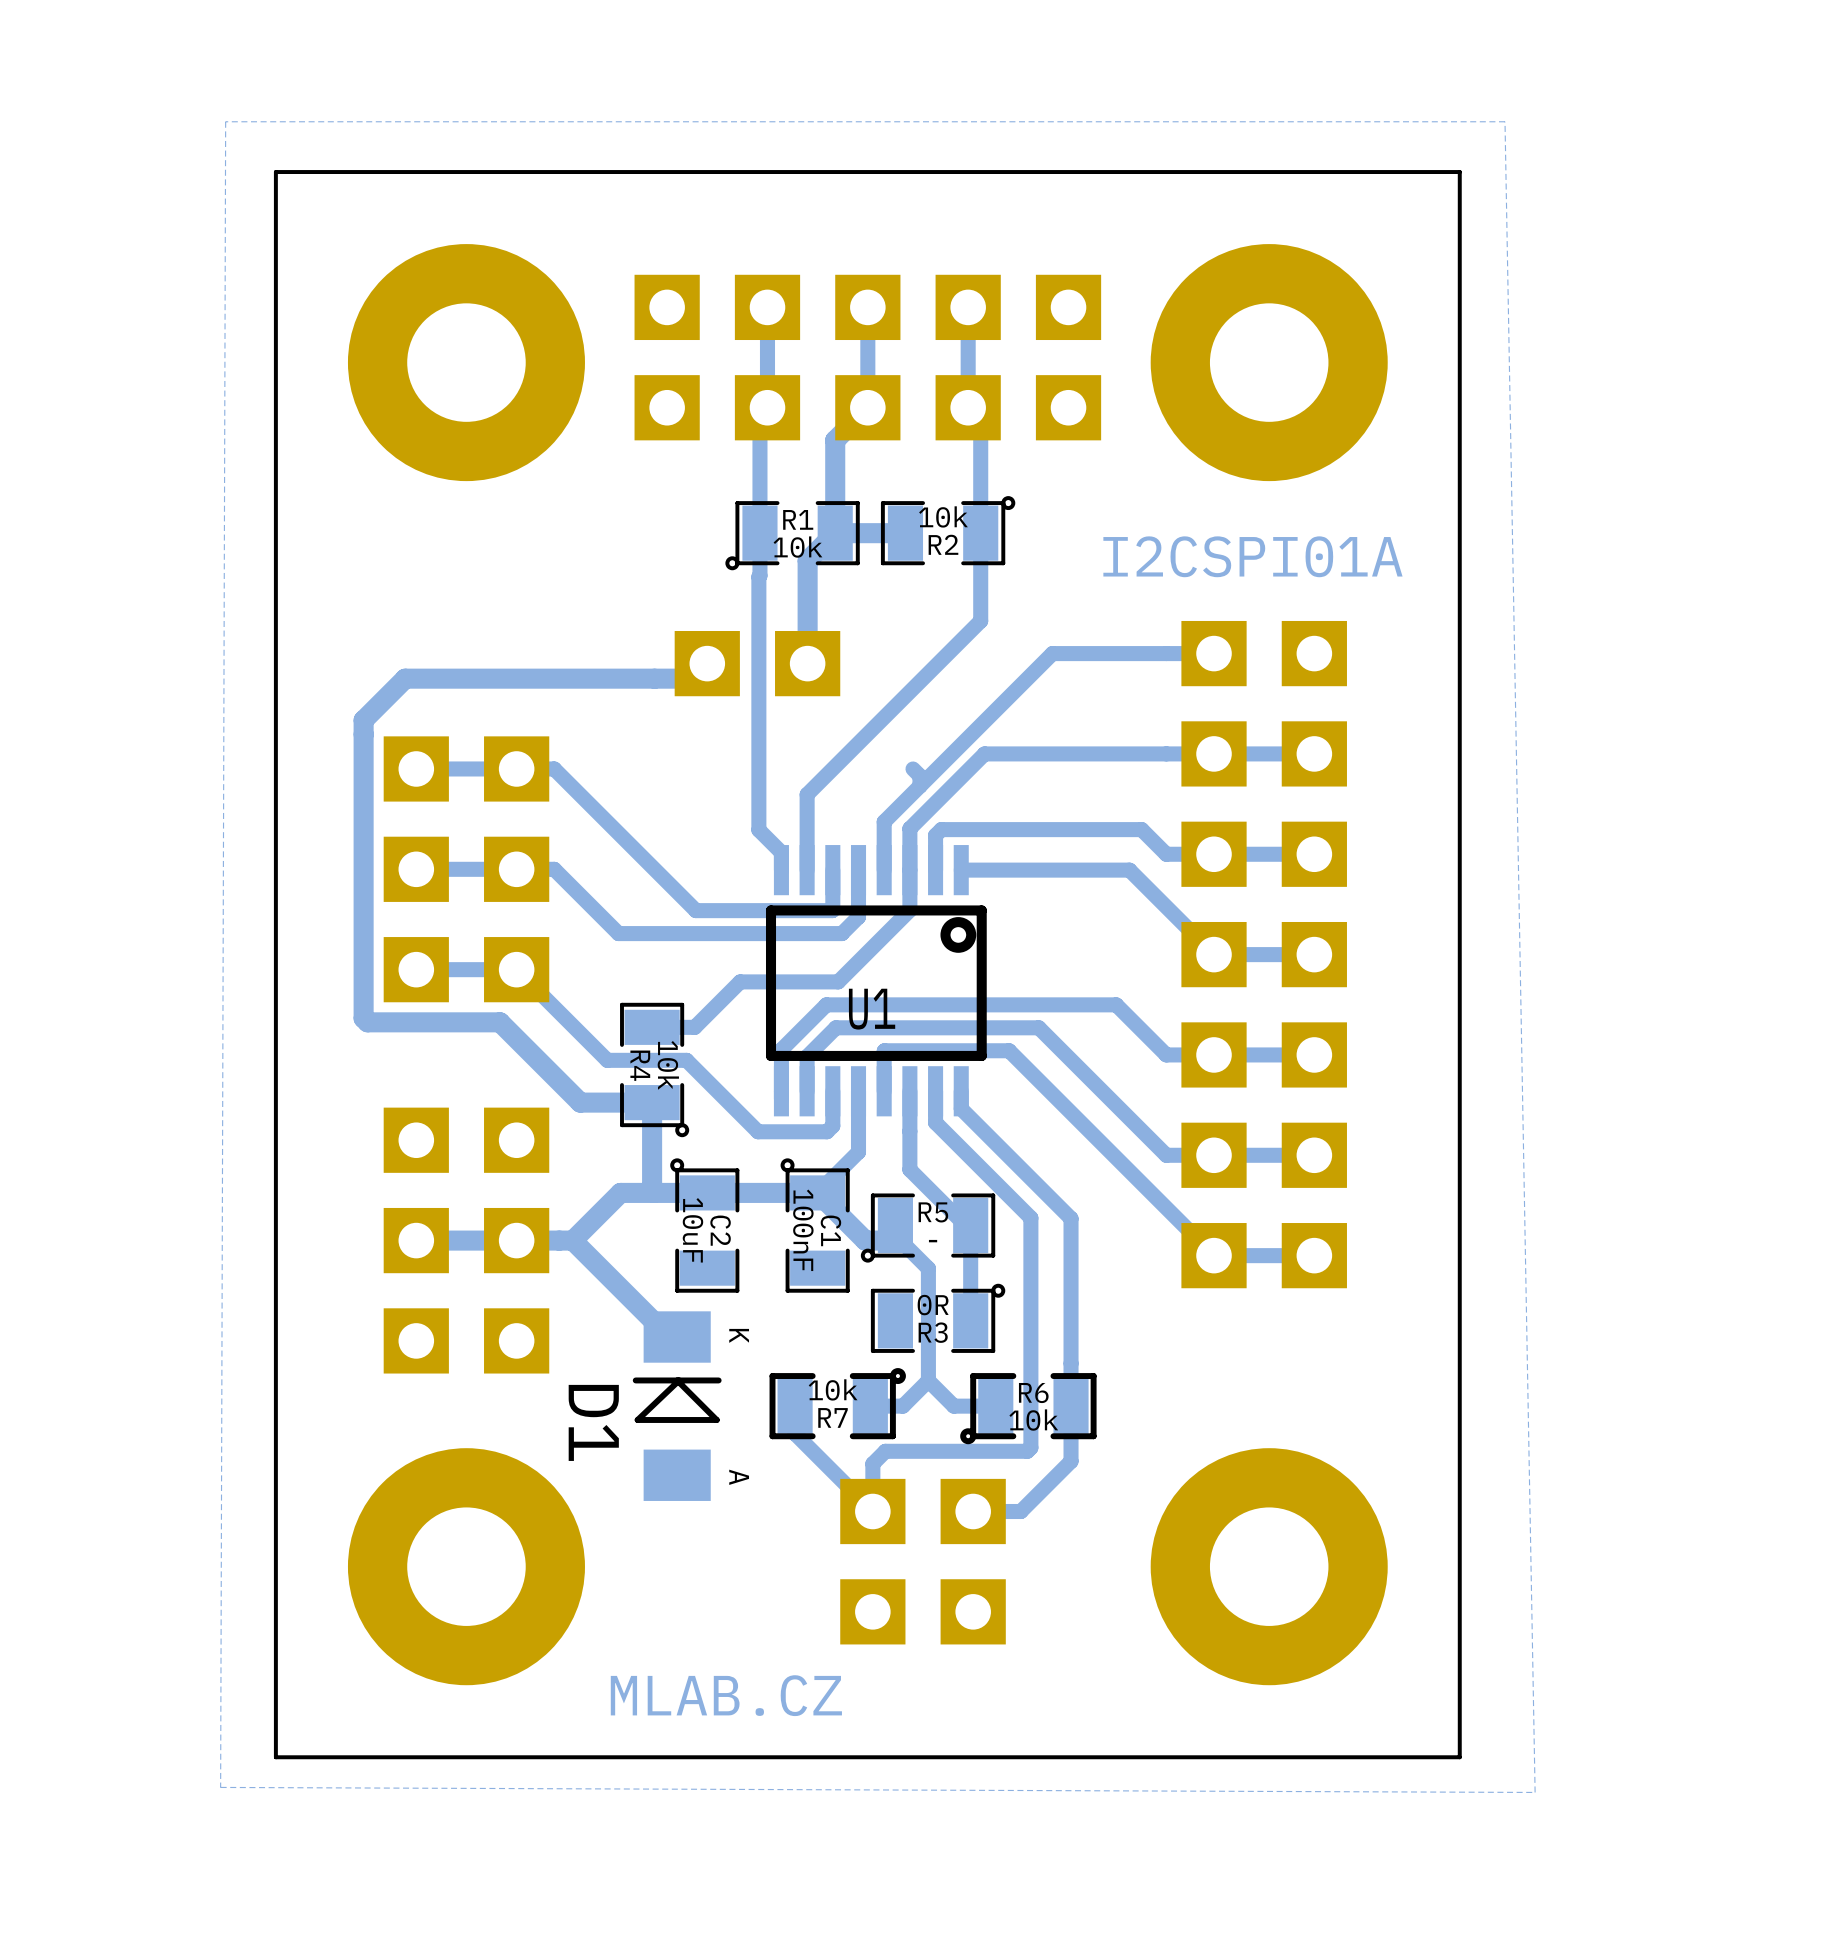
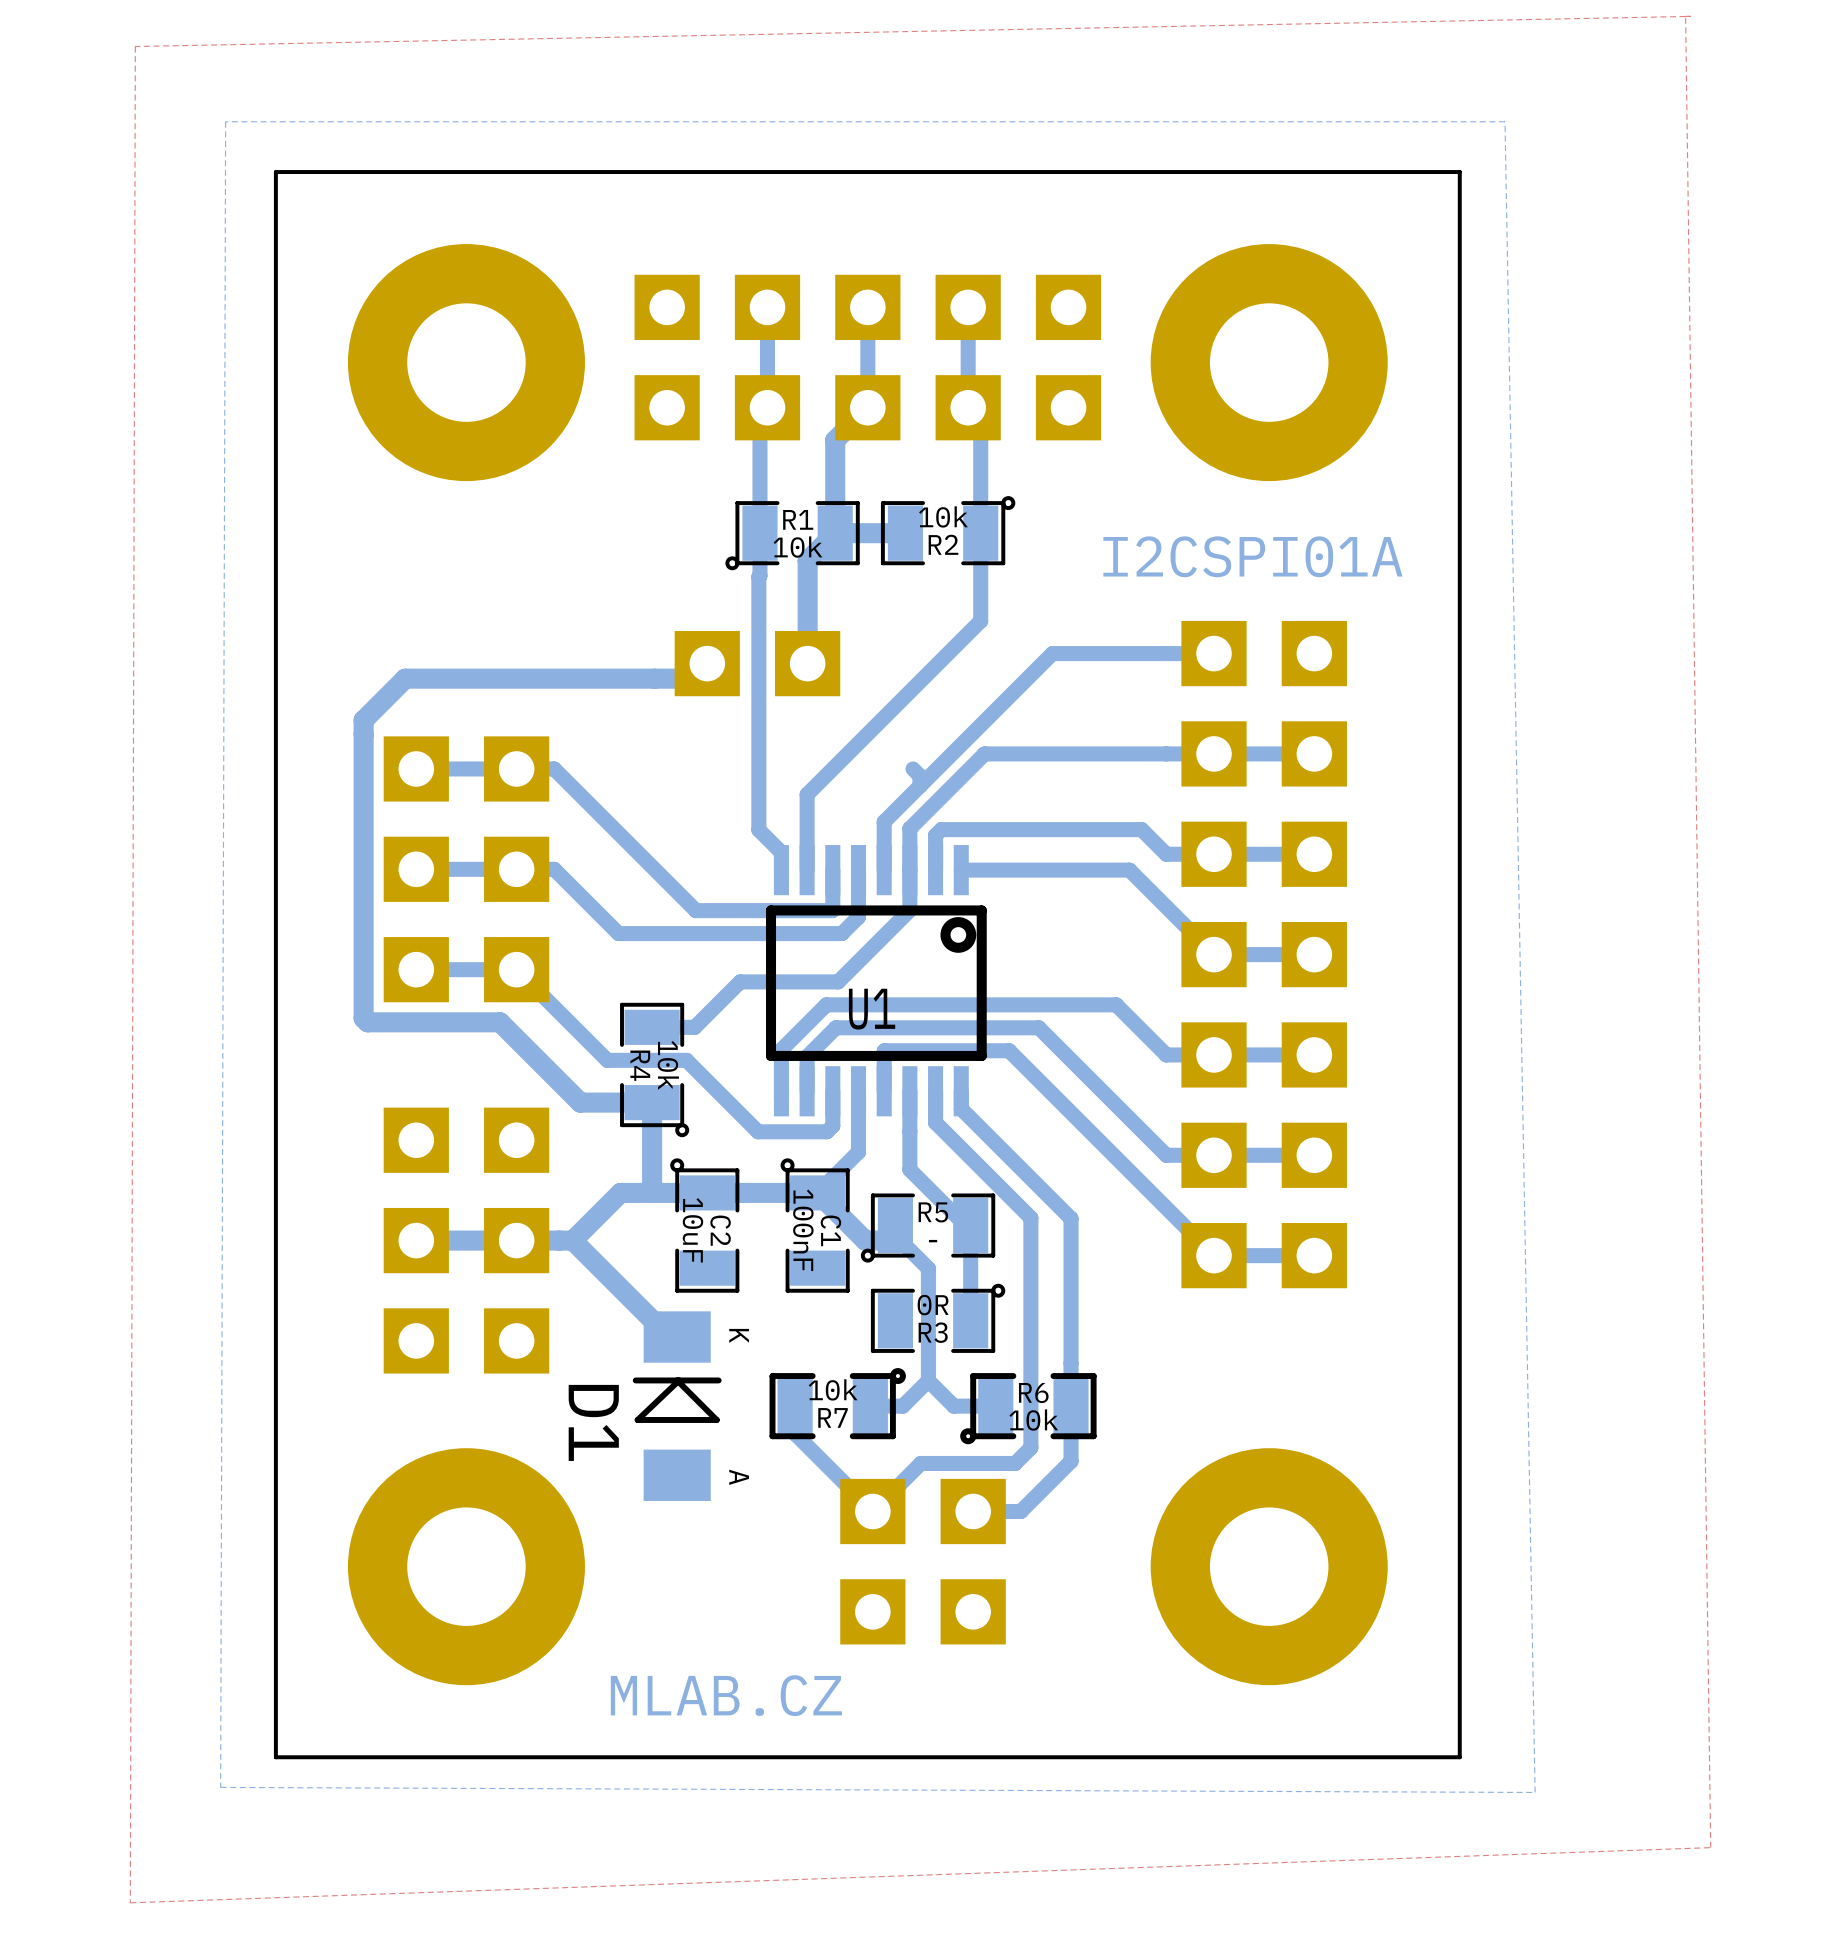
top zone outline: none -> (1690, 16) (135, 46) (130, 1902) (1710, 1847) (1685, 16) (1690, 16)
bottom track: (1027, 1451) (885, 1451) (872, 1463) (872, 1511) -> (1027, 1451) (1015, 1463) (920, 1463) (872, 1511)

